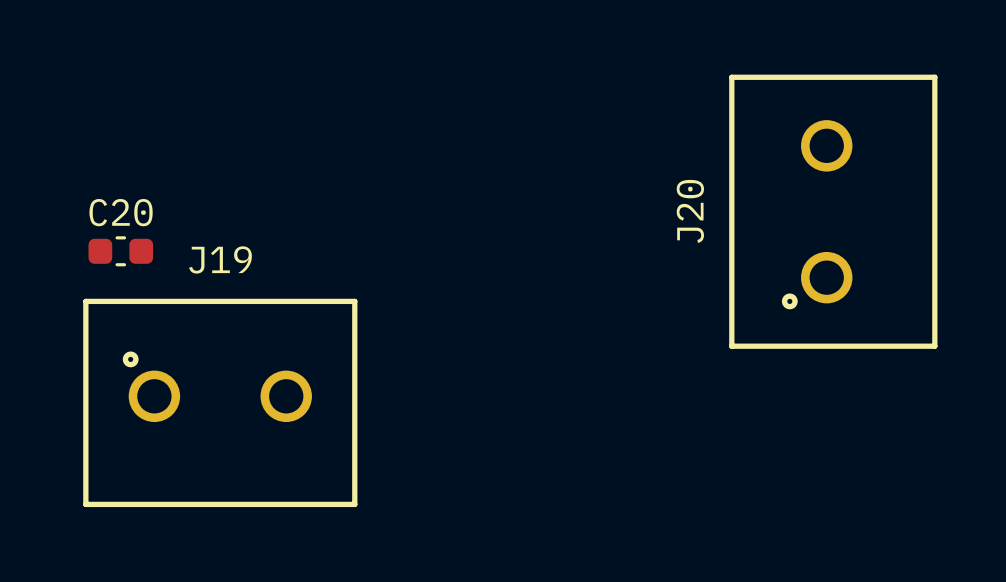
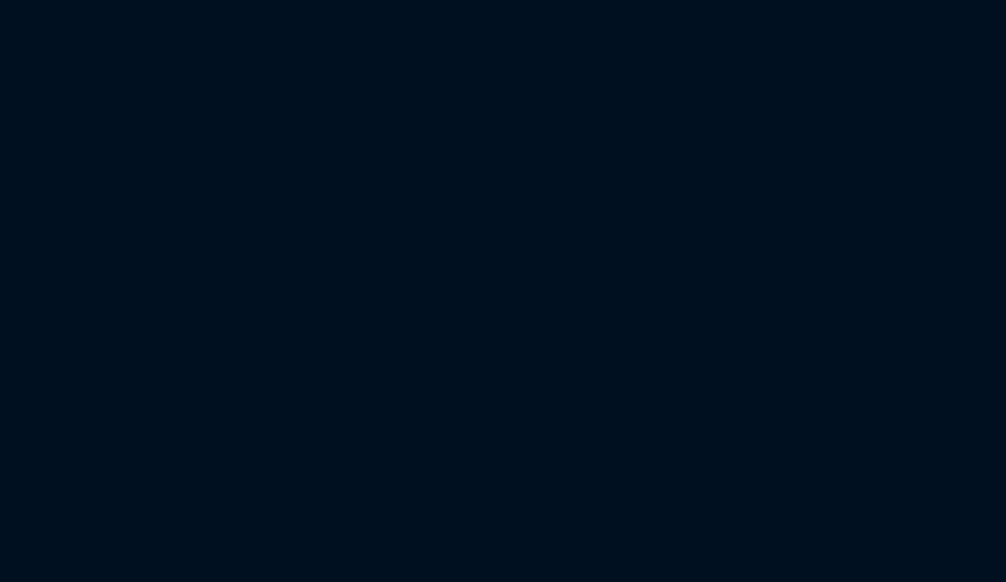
J20: (833, 211) -> none
C20: (120, 251) -> none
J19: (220, 402) -> none

